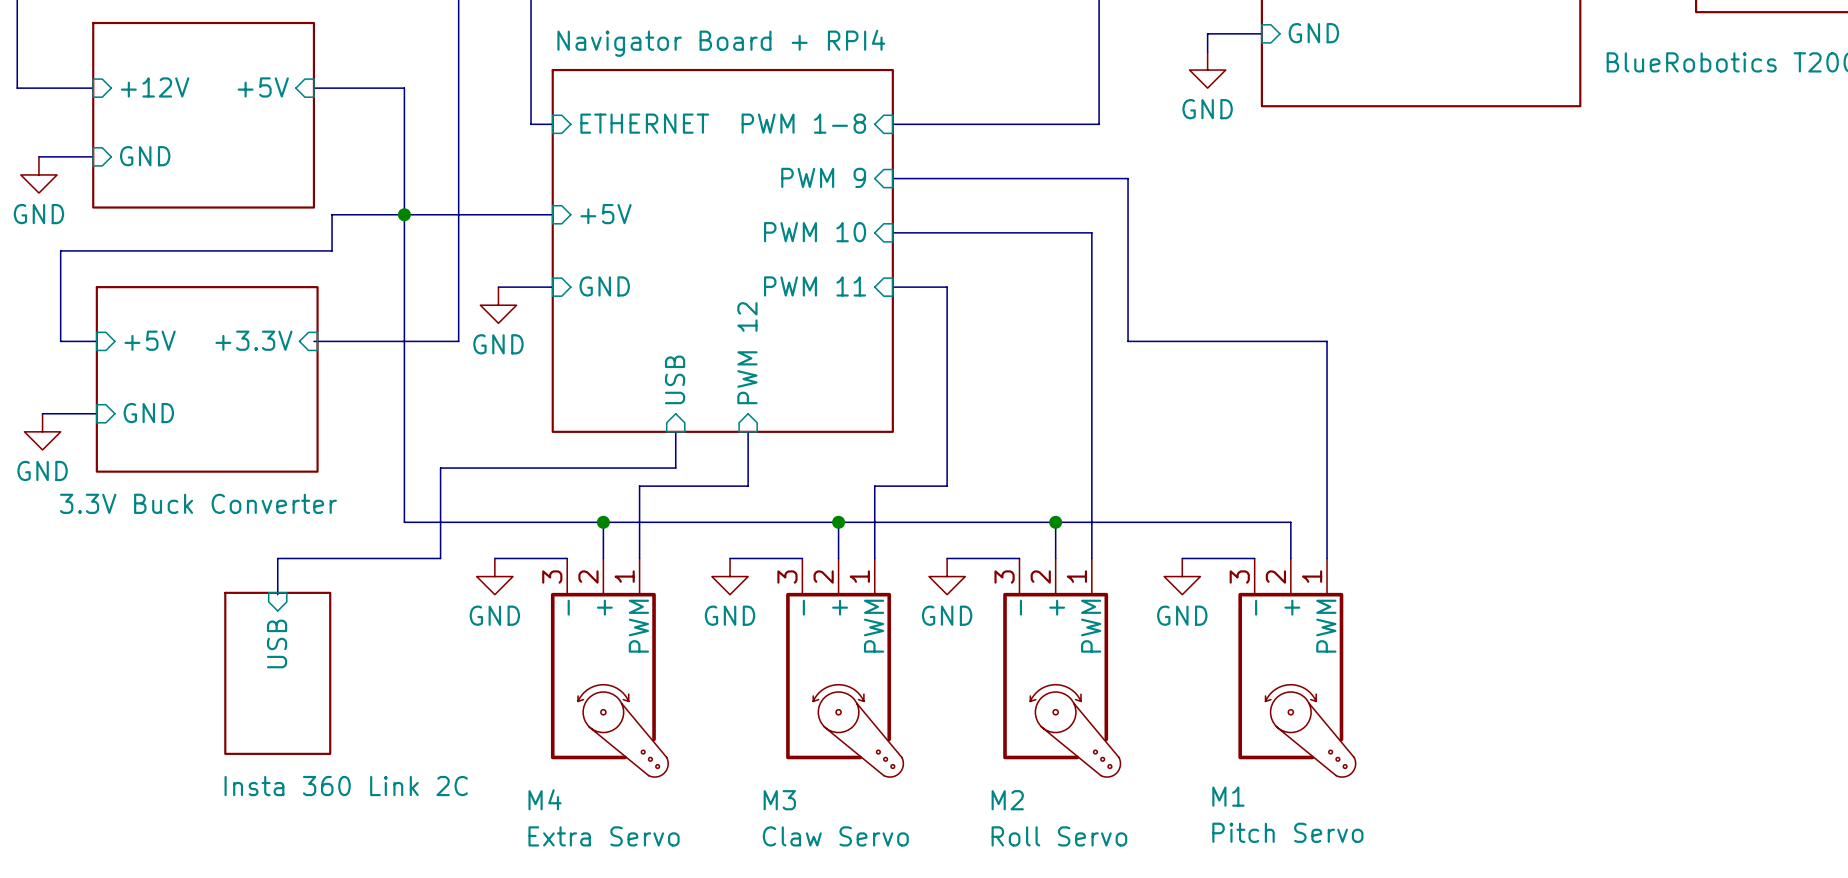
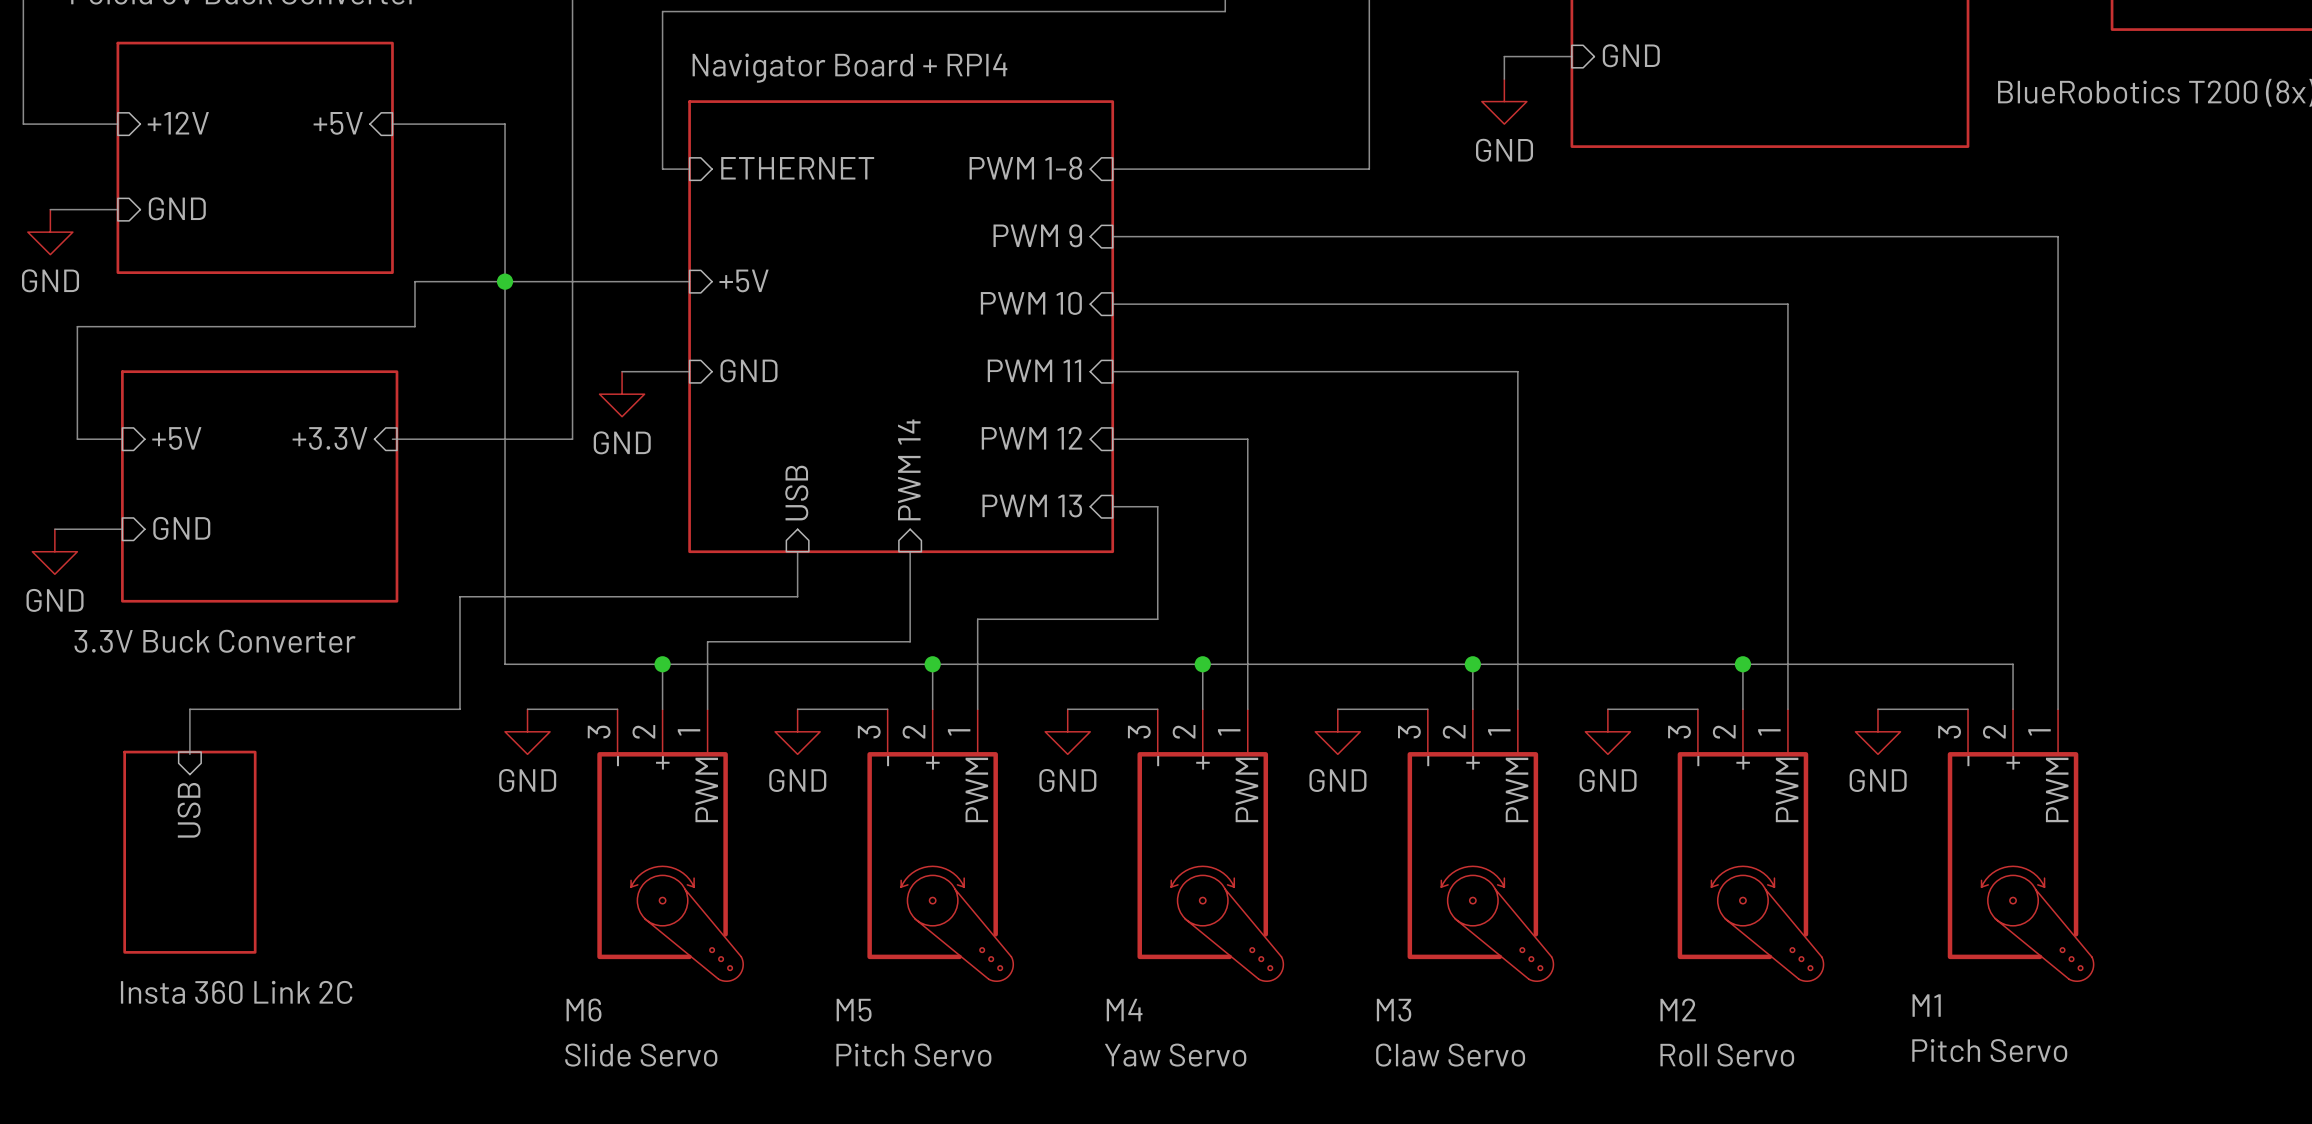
bus: (1128, 178) (1128, 341) (1327, 341) (1327, 558) -> (1405, 236) (2058, 236) (2058, 709)
bus: (1091, 232) (1091, 558) -> (1360, 304) (1787, 304) (1787, 709)
bus: (947, 287) (947, 486) (929, 486) -> (1112, 506) (1157, 506) (1157, 619)
bus: none -> (1180, 371) (1517, 371) (1517, 709)
bus: none -> (1112, 439) (1247, 439) (1247, 709)
sheet pin: none -> PWM 14 (909, 469)
sheet pin rotation: 0° (747, 353) -> 90° counterclockwise (1032, 438)
sheet pin position: USB (675, 379) -> USB (796, 493)
sheet pin: none -> PWM 13 (1032, 506)
bus: (675, 431) (675, 468) (639, 468) -> (797, 551) (797, 596)
bus: none -> (910, 551) (910, 641) (707, 641) (707, 709)
bus: (748, 431) (748, 486) (639, 486) (639, 558) -> (887, 709) (797, 709)
bus: (440, 468) (440, 558) -> (550, 596) (460, 596) (460, 709)
bus: (874, 486) (874, 558) -> (1090, 619) (977, 619) (977, 709)
junction: none -> (662, 664)
bus: (603, 522) (603, 558) -> (662, 664) (662, 709)
junction: (603, 522) -> none
junction: none -> (932, 664)
bus: (838, 522) (838, 558) -> (932, 664) (932, 709)
junction: (838, 522) -> none
junction: none -> (1202, 664)
bus: (1055, 522) (1055, 558) -> (1202, 664) (1202, 709)
junction: (1055, 522) -> none
junction: none -> (1472, 664)
bus: (1290, 522) (1290, 558) -> (1697, 709) (1607, 709)
bus: none -> (1607, 664) (2013, 664) (2013, 709)
bus: none -> (1742, 664) (1742, 709)
junction: none -> (1742, 664)
bus: (277, 558) (277, 594) -> (347, 709) (189, 709) (189, 754)
bus: (368, 558) (422, 558) -> none
bus: (494, 558) (567, 558) -> (617, 709) (550, 709)
bus: (730, 558) (802, 558) -> (1337, 709) (1427, 709)
bus: (947, 558) (1019, 558) -> (1067, 709) (1157, 709)
bus: (1182, 558) (1254, 558) -> (1472, 709) (1472, 664)
bus: none -> (1877, 709) (1968, 709)
power symbol: none -> GND (527, 731)
power symbol: GND (494, 576) -> none
power symbol: none -> GND (797, 731)
power symbol: GND (730, 576) -> none
power symbol: none -> GND (1067, 731)
power symbol: GND (947, 576) -> none
power symbol: none -> GND (1337, 731)
power symbol: GND (1182, 576) -> none
power symbol: none -> GND (1607, 731)
power symbol: none -> GND (1877, 731)
sheet pin position: USB (277, 643) -> USB (189, 810)
M6: none -> Slide Servo (670, 845)
M4 position: (609, 667) -> (1210, 845)
M5: none -> Pitch Servo (940, 845)
M3 position: (844, 667) -> (1480, 845)
M2 position: (1061, 667) -> (1750, 845)
M1 position: (1297, 667) -> (2020, 845)
sheet Insta 360 Link 2C position: (277, 673) -> (189, 852)
M4 value: Extra Servo (604, 836) -> Yaw Servo (1175, 1055)

